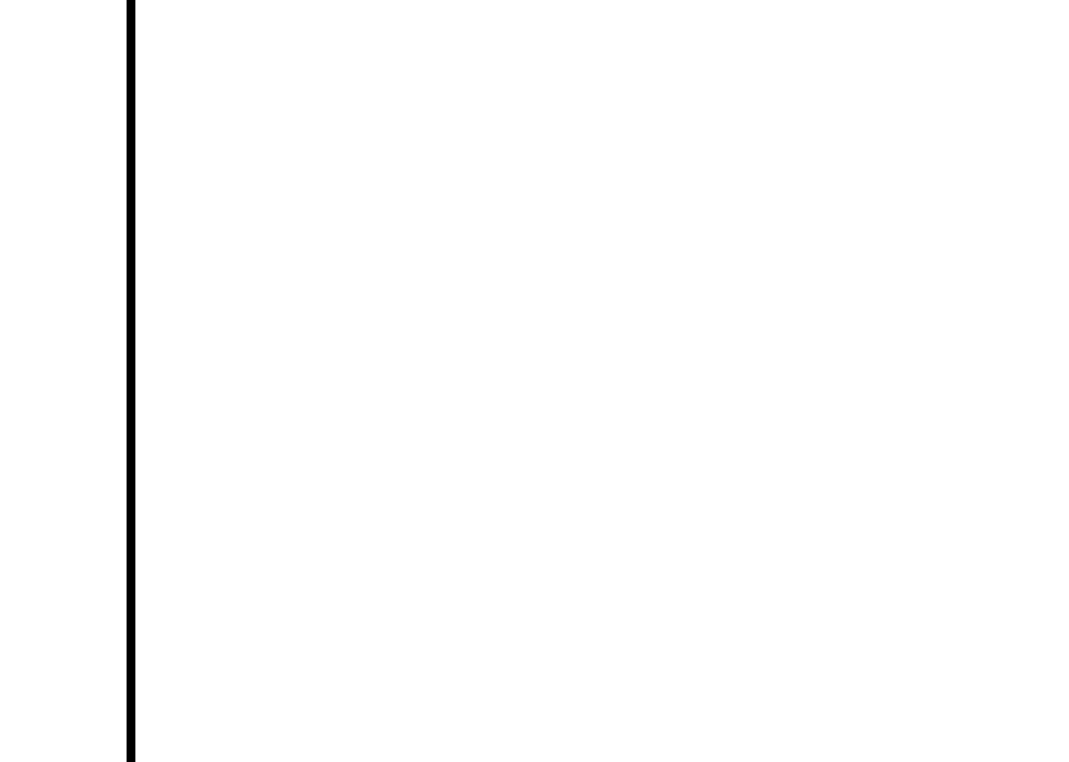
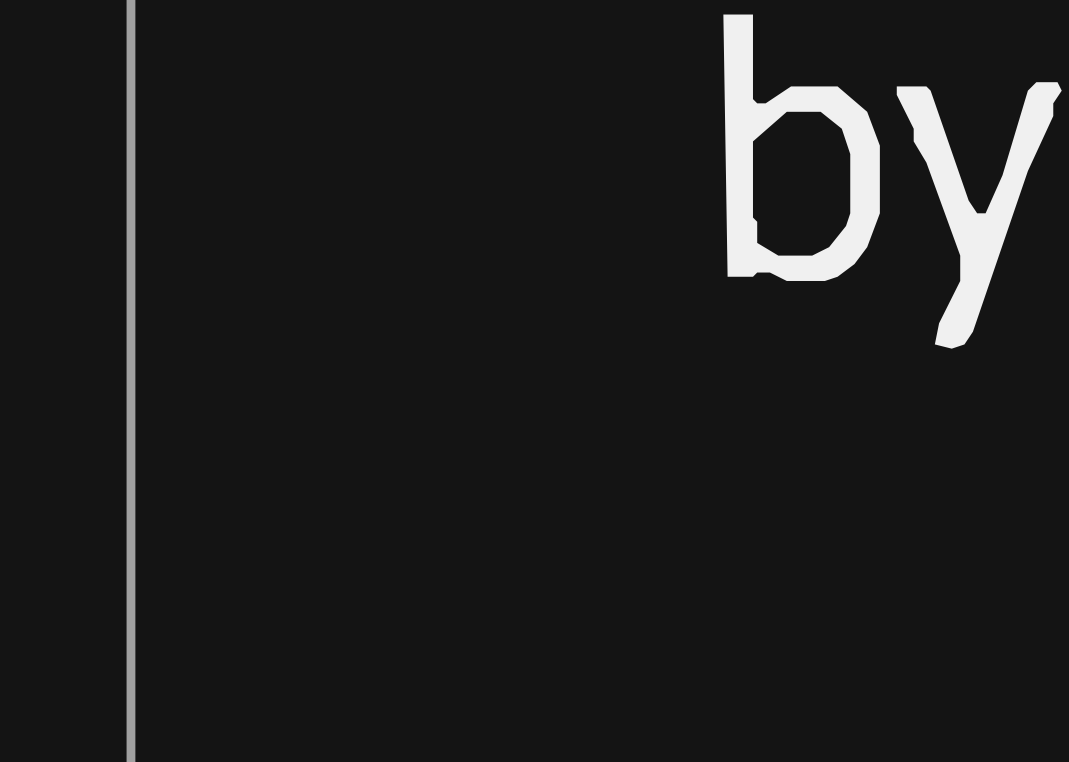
drawing: none -> [723, 14, 1062, 349]

